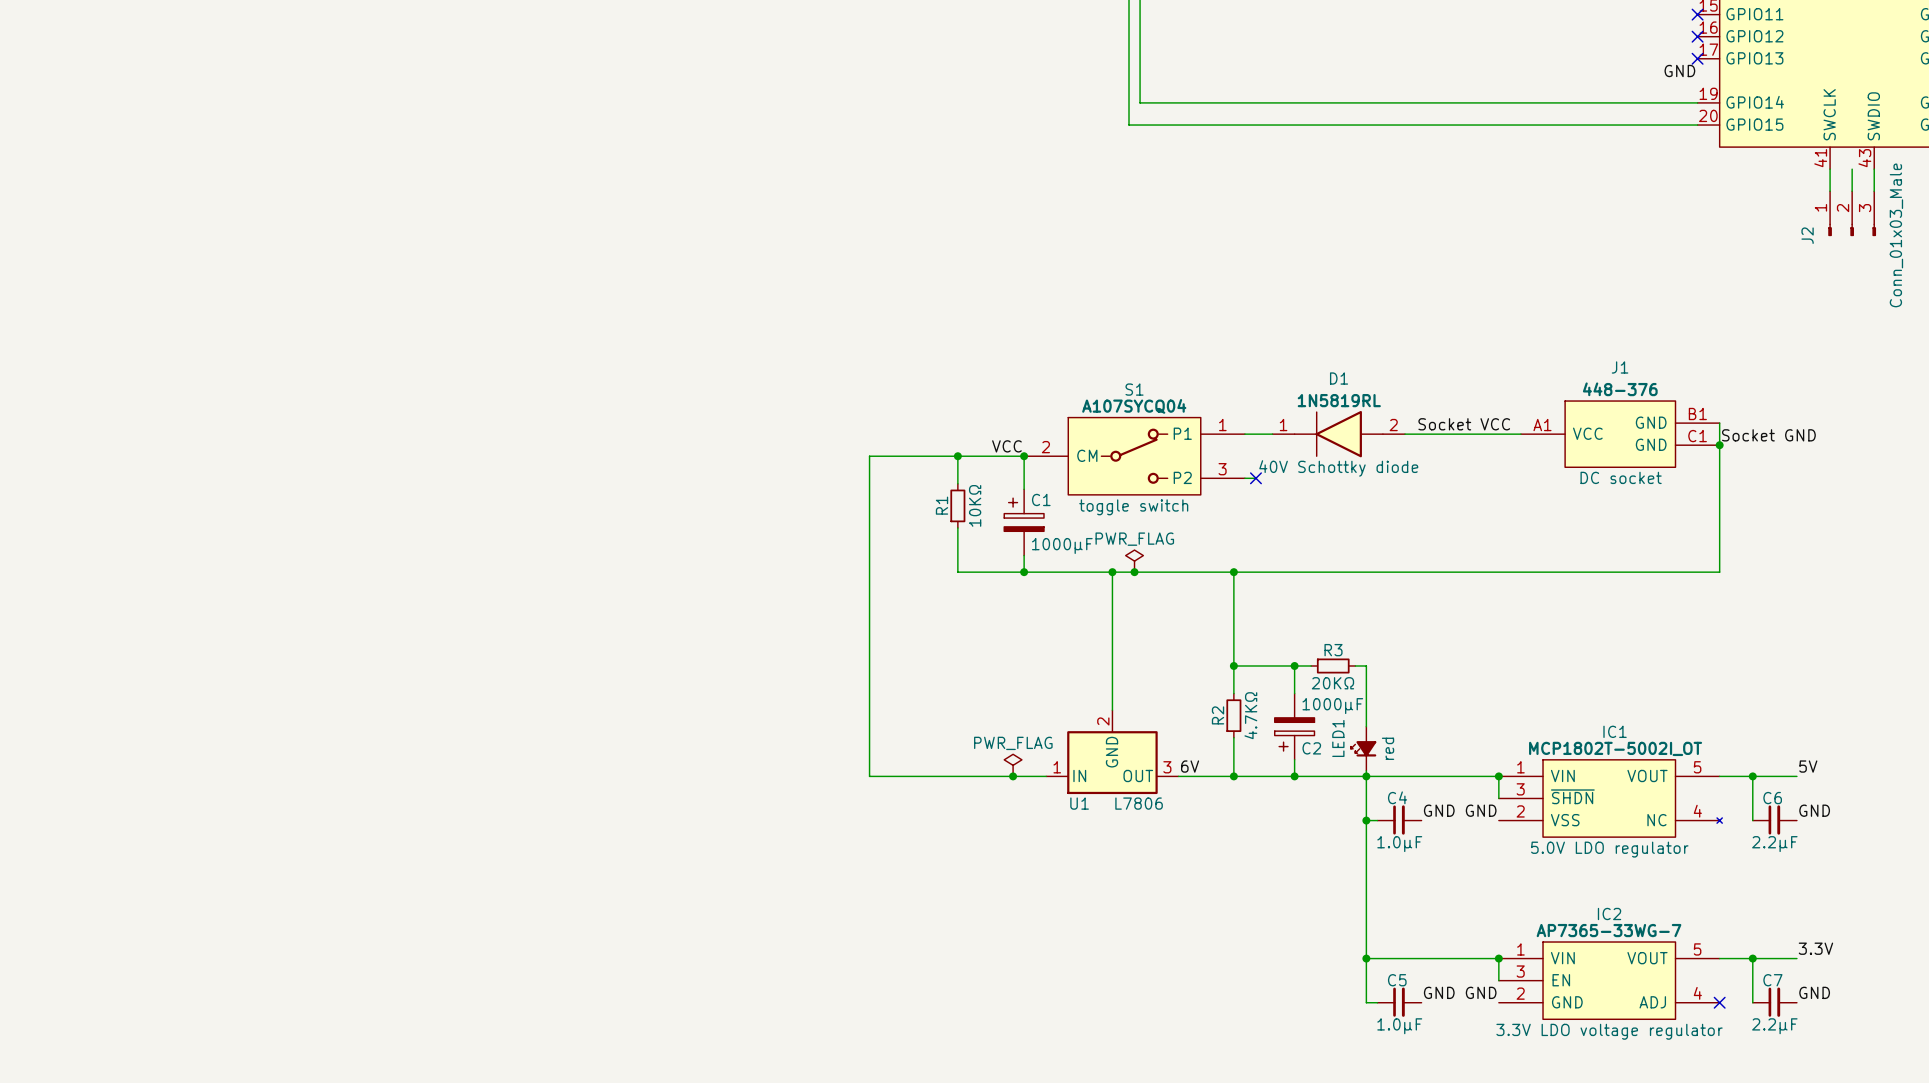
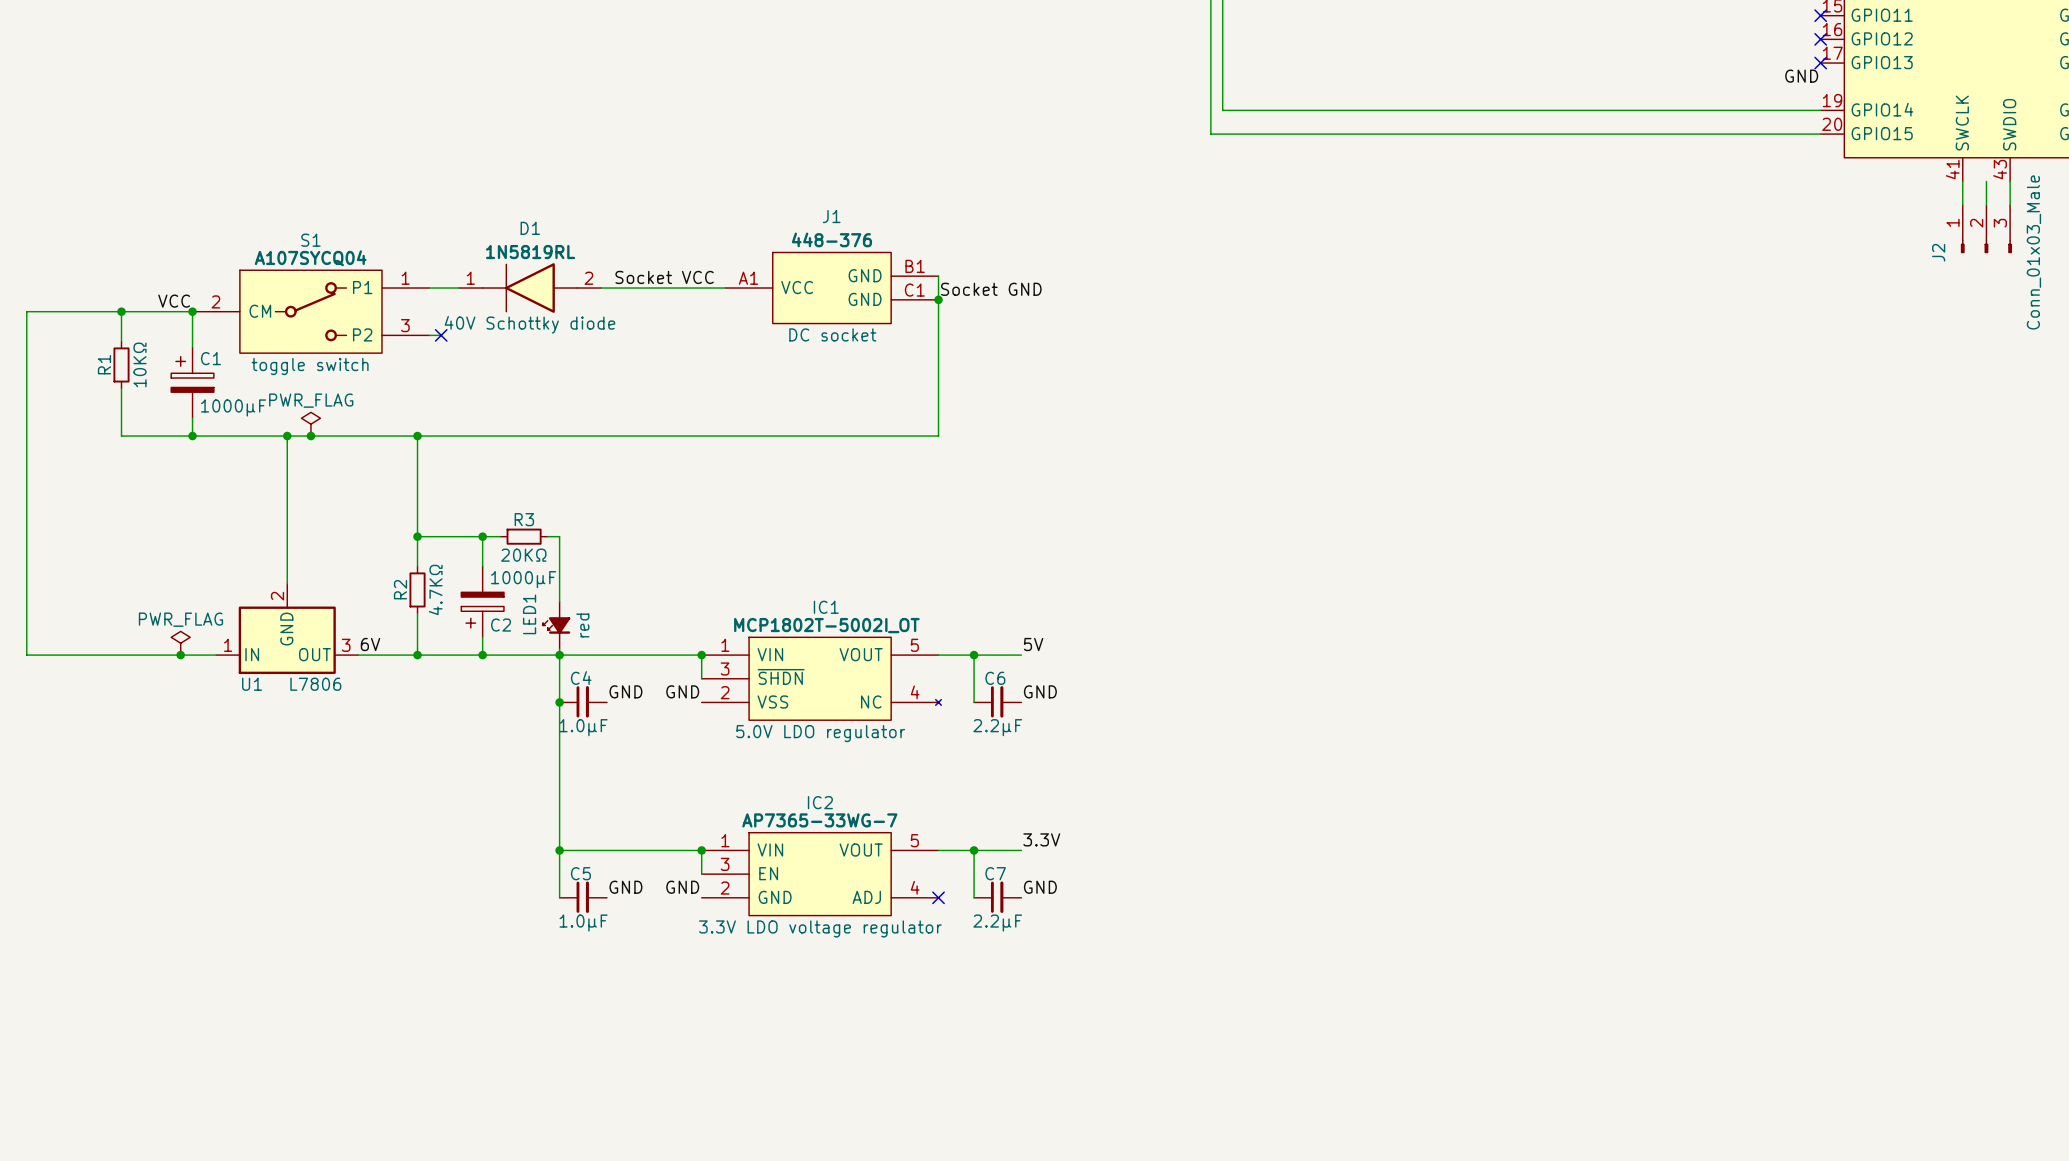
wire: none -> (938, 276) (938, 436) (121, 436) (121, 388)
label: none -> Socket VCC (664, 277)
wire: none -> (429, 288) (458, 288)
wire: none -> (601, 288) (725, 288)
label: none -> Socket GND (991, 289)
junction: none -> (938, 299)
label: none -> VCC (174, 301)
wire: none -> (121, 311) (121, 341)
junction: none -> (121, 311)
junction: none -> (192, 311)
wire: none -> (429, 335) (441, 335)
no-connect mark: none -> (441, 335)
wire: none -> (192, 347) (192, 311) (26, 311) (26, 655) (216, 655)
wire: none -> (192, 418) (192, 436)
power symbol: none -> PWR_FLAG (310, 424)
junction: none -> (192, 436)
wire: none -> (287, 436) (287, 584)
junction: none -> (287, 436)
junction: none -> (310, 436)
wire: none -> (417, 436) (417, 566)
junction: none -> (417, 436)
wire: (1719, 423) (1719, 572) (957, 572) (957, 527) -> none
label: Socket VCC (1464, 424) -> none
wire: (1244, 434) (1272, 434) -> none
D1 position: (1338, 434) -> (530, 288)
wire: (1405, 434) (1520, 434) -> none
J1 position: (1620, 434) -> (831, 288)
label: Socket GND (1768, 435) -> none
junction: (1719, 445) -> none
label: VCC (1006, 446) -> none
wire: (957, 456) (957, 483) -> none
junction: (957, 456) -> none
junction: (1024, 456) -> none
S1 position: (1134, 456) -> (310, 311)
wire: (1244, 478) (1255, 478) -> none
no-connect mark: (1255, 478) -> none
wire: (1024, 489) (1024, 456) (869, 456) (869, 776) (1046, 776) -> none
wire: none -> (417, 536) (500, 536)
junction: none -> (417, 536)
wire: none -> (482, 536) (482, 566)
junction: none -> (482, 536)
wire: none -> (547, 536) (559, 536) (559, 601)
R1 position: (957, 505) -> (121, 364)
C1 position: (1024, 522) -> (192, 382)
wire: (1024, 555) (1024, 572) -> none
power symbol: PWR_FLAG (1134, 561) -> none
wire: none -> (417, 613) (417, 655)
junction: (1024, 572) -> none
wire: (1112, 572) (1112, 710) -> none
junction: (1112, 572) -> none
junction: (1134, 572) -> none
wire: (1233, 572) (1233, 693) -> none
junction: (1233, 572) -> none
wire: none -> (482, 637) (482, 655)
power symbol: none -> PWR_FLAG (180, 643)
label: none -> 6V (370, 644)
label: none -> 5V (1033, 644)
wire: none -> (559, 649) (559, 897)
junction: none -> (180, 655)
wire: none -> (358, 655) (701, 655) (701, 678)
junction: none -> (417, 655)
junction: none -> (482, 655)
junction: none -> (559, 655)
junction: none -> (701, 655)
wire: none -> (938, 655) (1021, 655)
wire: none -> (974, 655) (974, 702)
junction: none -> (974, 655)
label: none -> GND (625, 691)
label: none -> GND (682, 691)
label: none -> GND (1040, 691)
junction: none -> (559, 702)
wire: (1233, 665) (1311, 665) -> none
junction: (1233, 665) -> none
wire: (1294, 665) (1294, 693) -> none
junction: (1294, 665) -> none
R3 position: (1333, 665) -> (524, 536)
wire: (1355, 665) (1366, 665) (1366, 726) -> none
R2 position: (1233, 715) -> (417, 589)
C2 position: (1294, 726) -> (482, 601)
wire: (1233, 737) (1233, 776) -> none
LED1 position: (1363, 748) -> (556, 625)
U1 position: (1112, 752) -> (287, 629)
wire: (1294, 759) (1294, 776) -> none
power symbol: PWR_FLAG (1013, 765) -> none
label: 6V (1190, 766) -> none
label: 5V (1808, 766) -> none
wire: (1366, 770) (1366, 1002) (1377, 1002) -> none
junction: (1013, 776) -> none
wire: (1178, 776) (1498, 776) (1498, 798) -> none
junction: (1233, 776) -> none
junction: (1294, 776) -> none
junction: (1366, 776) -> none
junction: (1498, 776) -> none
wire: (1719, 776) (1796, 776) -> none
wire: (1752, 776) (1752, 820) -> none
junction: (1752, 776) -> none
label: none -> 3.3V (1041, 839)
wire: none -> (559, 850) (701, 850) (701, 874)
junction: none -> (559, 850)
junction: none -> (701, 850)
wire: none -> (938, 850) (1021, 850)
wire: none -> (974, 850) (974, 897)
junction: none -> (974, 850)
IC1 position: (1610, 798) -> (821, 678)
label: GND (1439, 810) -> none
label: GND (1481, 810) -> none
label: GND (1814, 810) -> none
wire: (1366, 820) (1377, 820) -> none
junction: (1366, 820) -> none
C4 position: (1399, 820) -> (583, 701)
C6 position: (1774, 820) -> (997, 701)
label: none -> GND (625, 887)
label: none -> GND (682, 887)
label: none -> GND (1040, 887)
no-connect mark: none -> (938, 897)
label: 3.3V (1815, 948) -> none
wire: (1366, 958) (1498, 958) (1498, 980) -> none
junction: (1366, 958) -> none
junction: (1498, 958) -> none
wire: (1719, 958) (1796, 958) -> none
wire: (1752, 958) (1752, 1002) -> none
junction: (1752, 958) -> none
IC2 position: (1609, 980) -> (820, 874)
label: GND (1439, 992) -> none
label: GND (1481, 992) -> none
label: GND (1814, 992) -> none
C5 position: (1399, 1002) -> (583, 897)
no-connect mark: (1719, 1002) -> none
C7 position: (1774, 1002) -> (997, 897)

